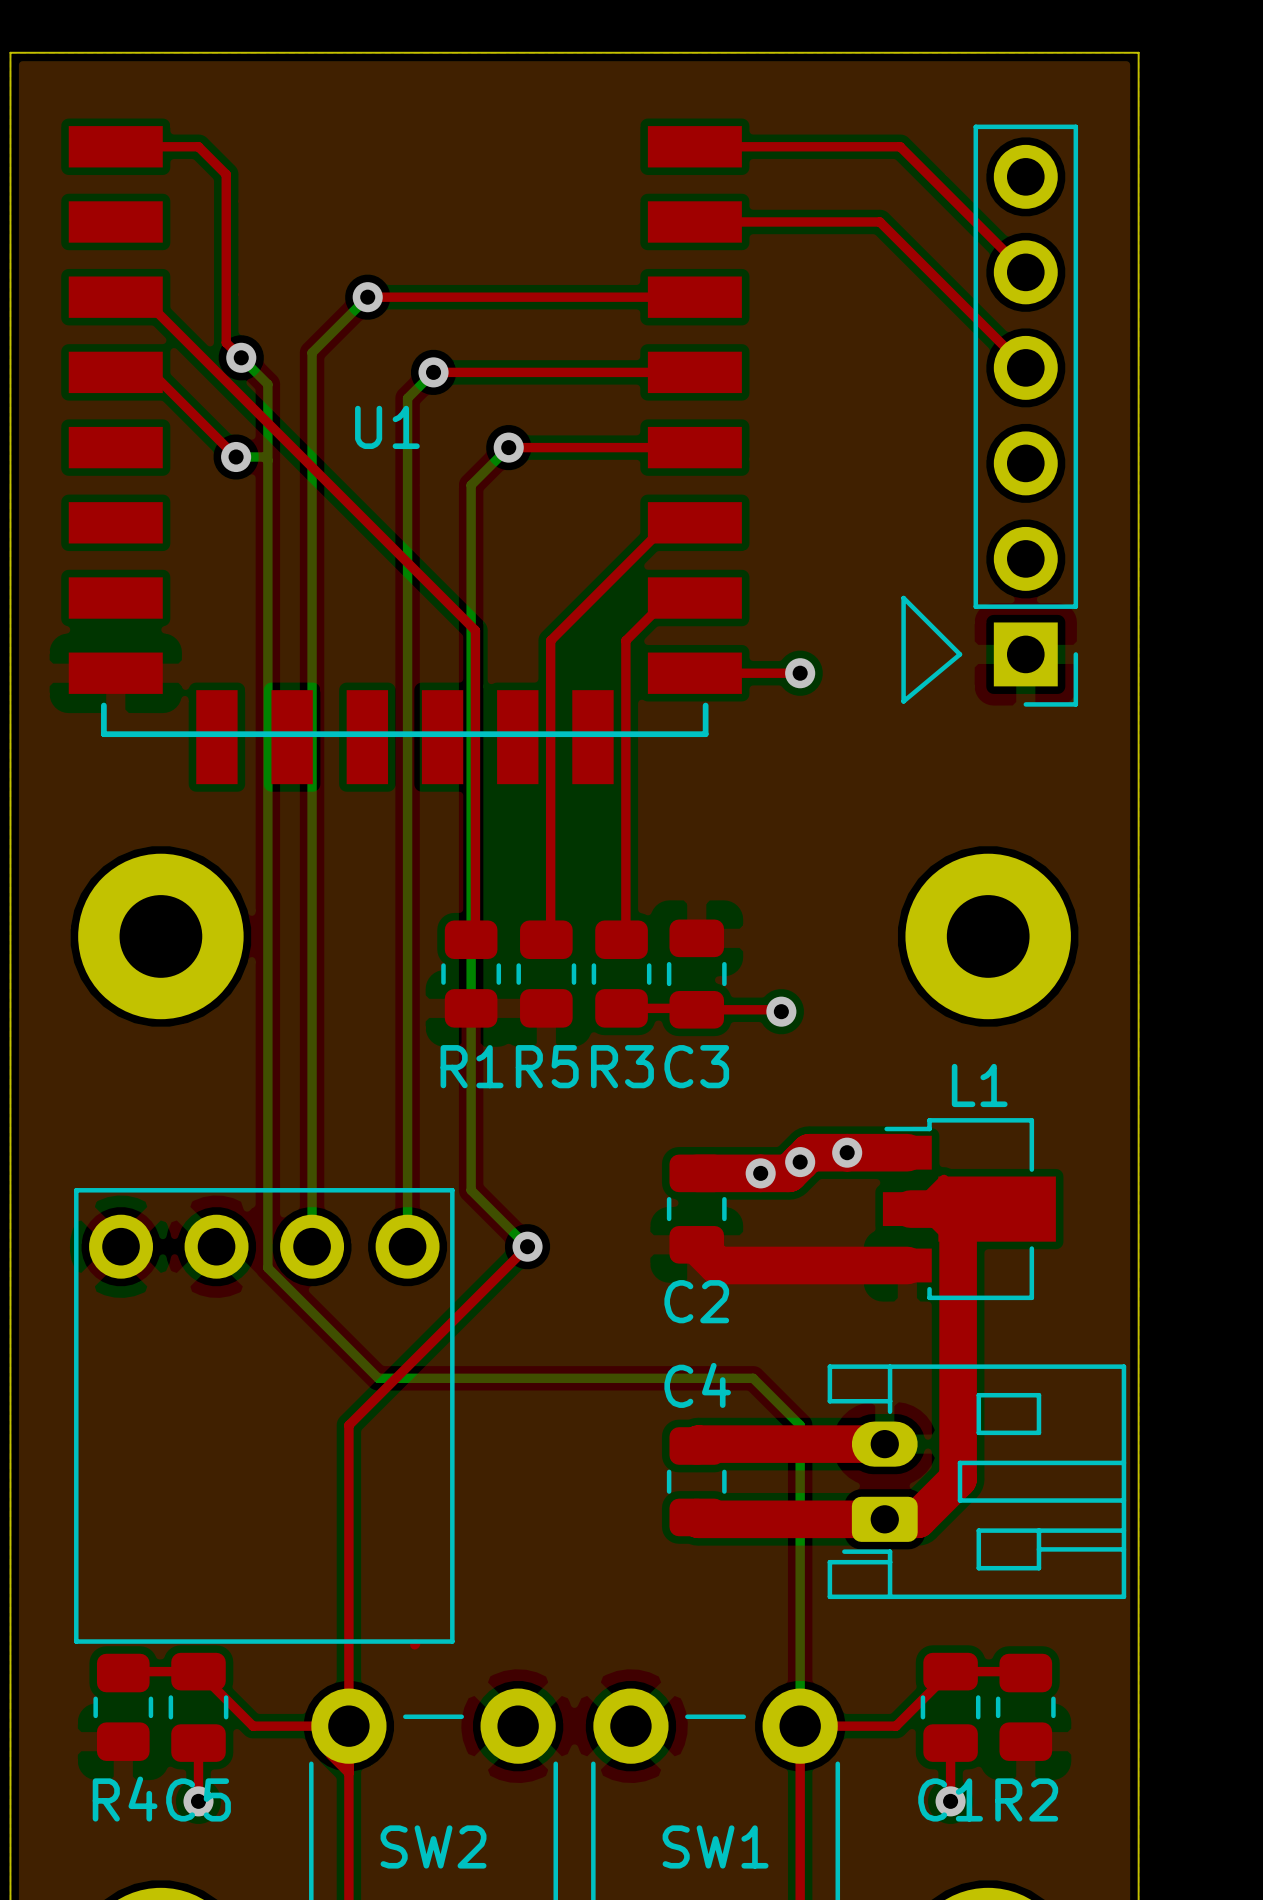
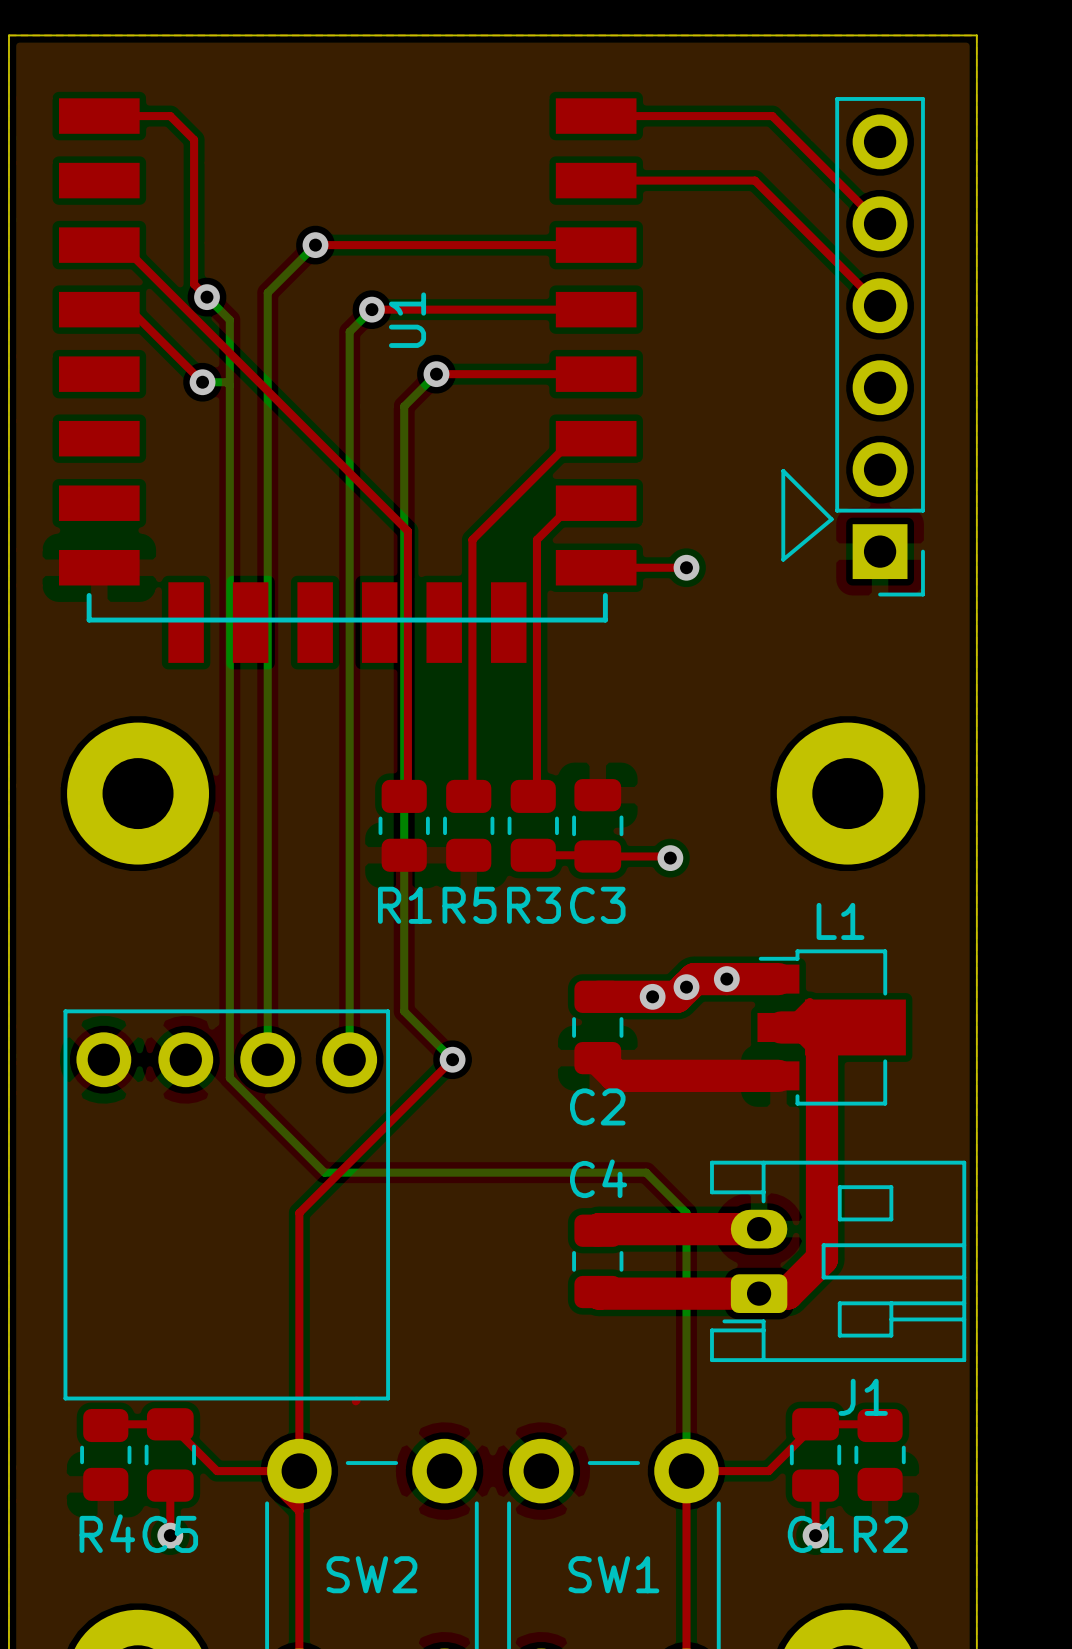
U1 name rotation: 0° (387, 427) -> 90° counterclockwise (407, 320)
U1 name position: U1 (387, 427) -> U1 (407, 320)
line: (903, 598) (903, 701) (959, 654) (903, 598) -> (783, 470) (783, 559) (831, 519) (783, 470)
J1 name: none -> J1 (863, 1397)

